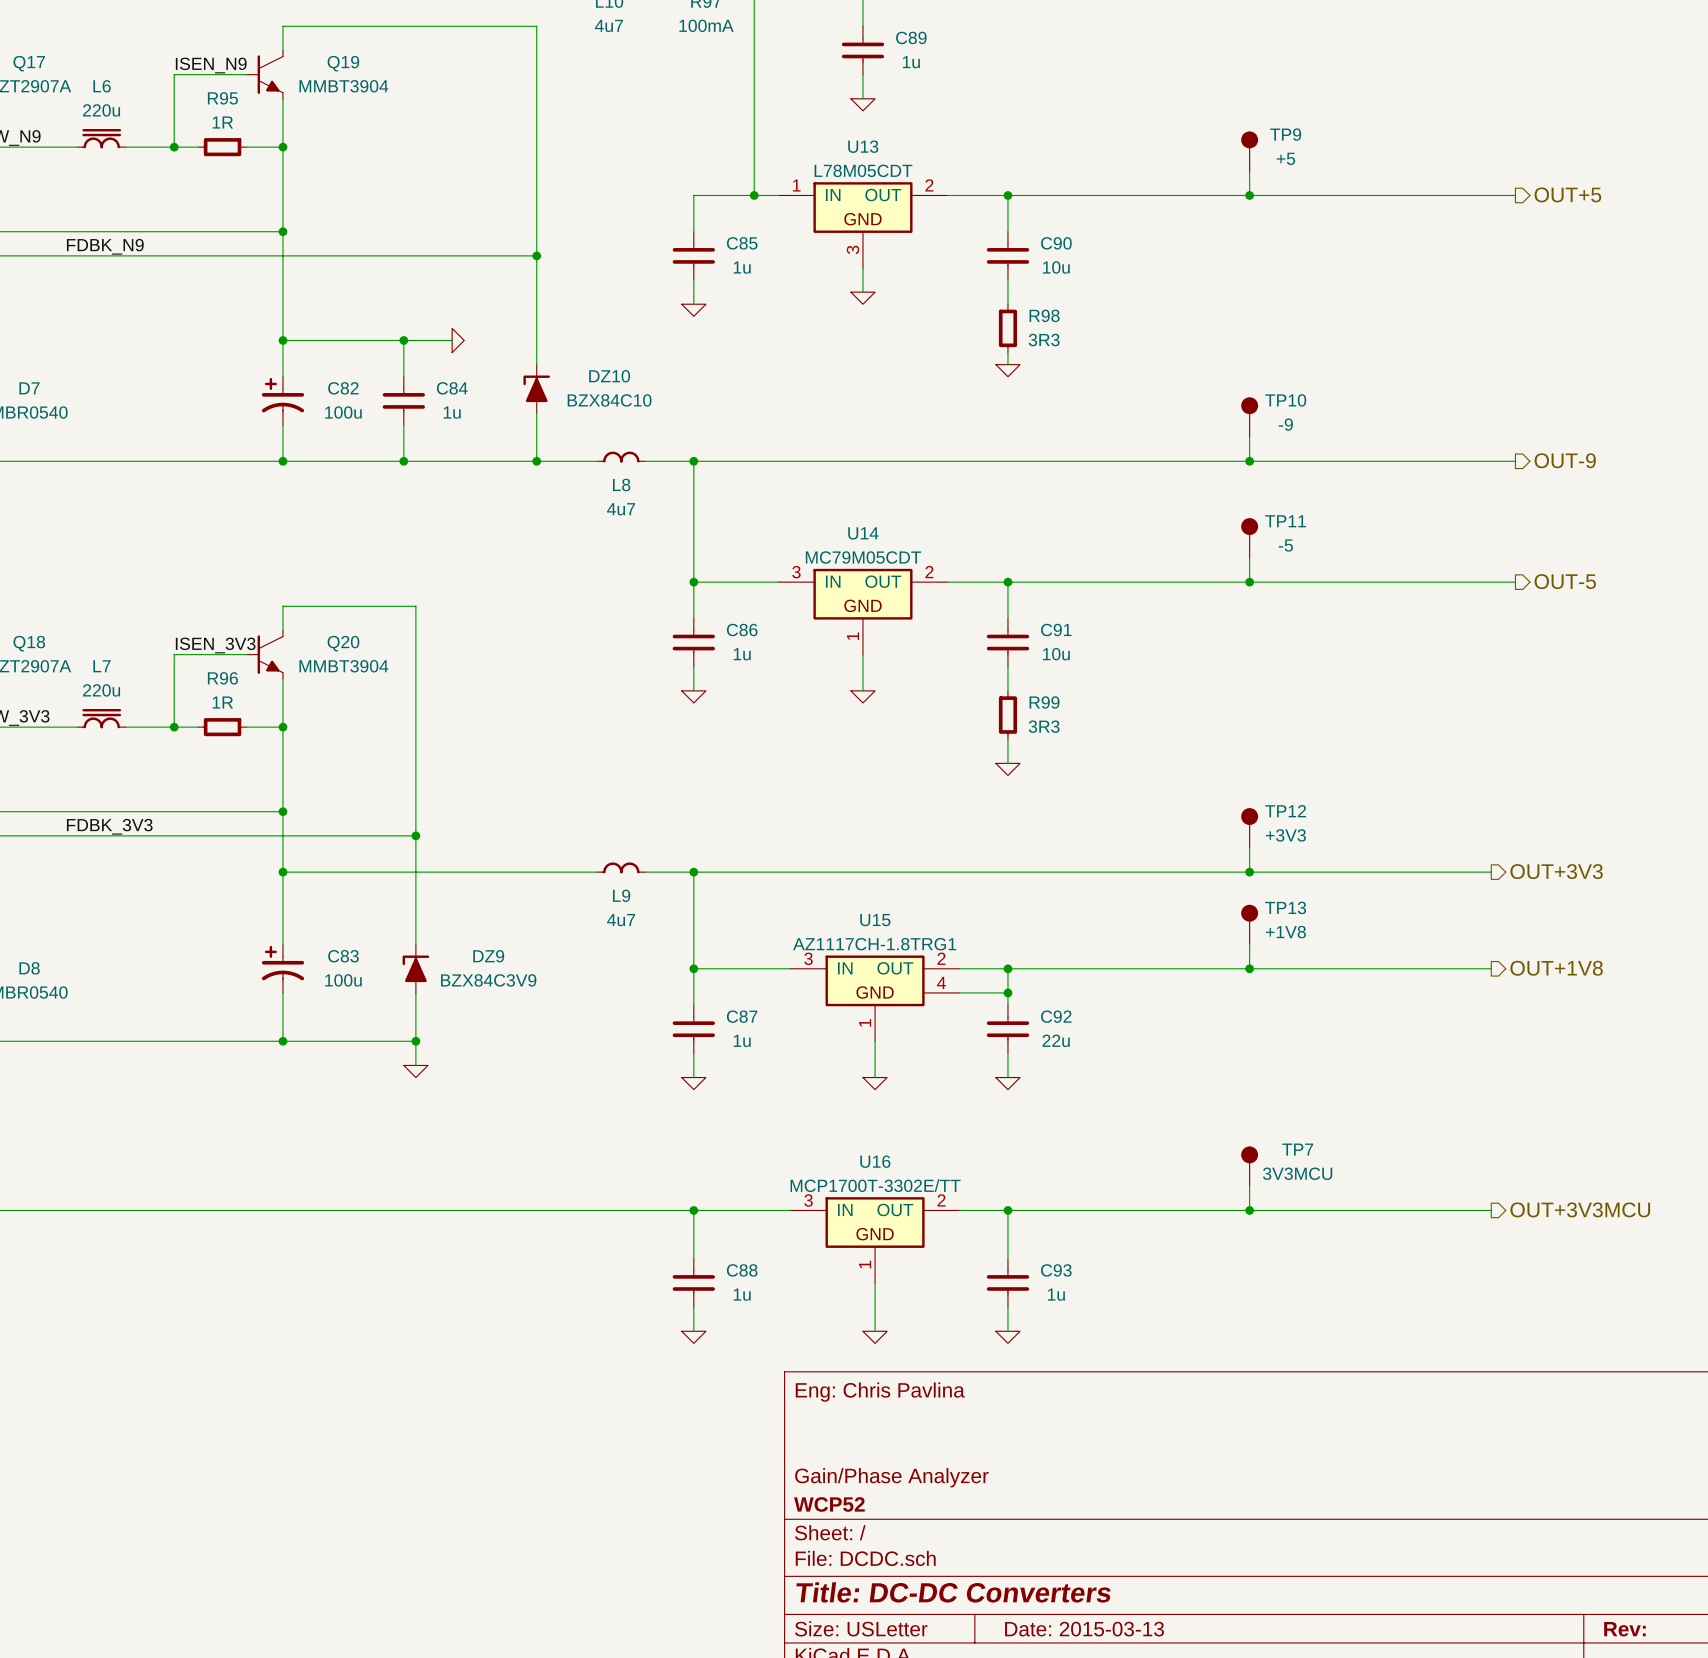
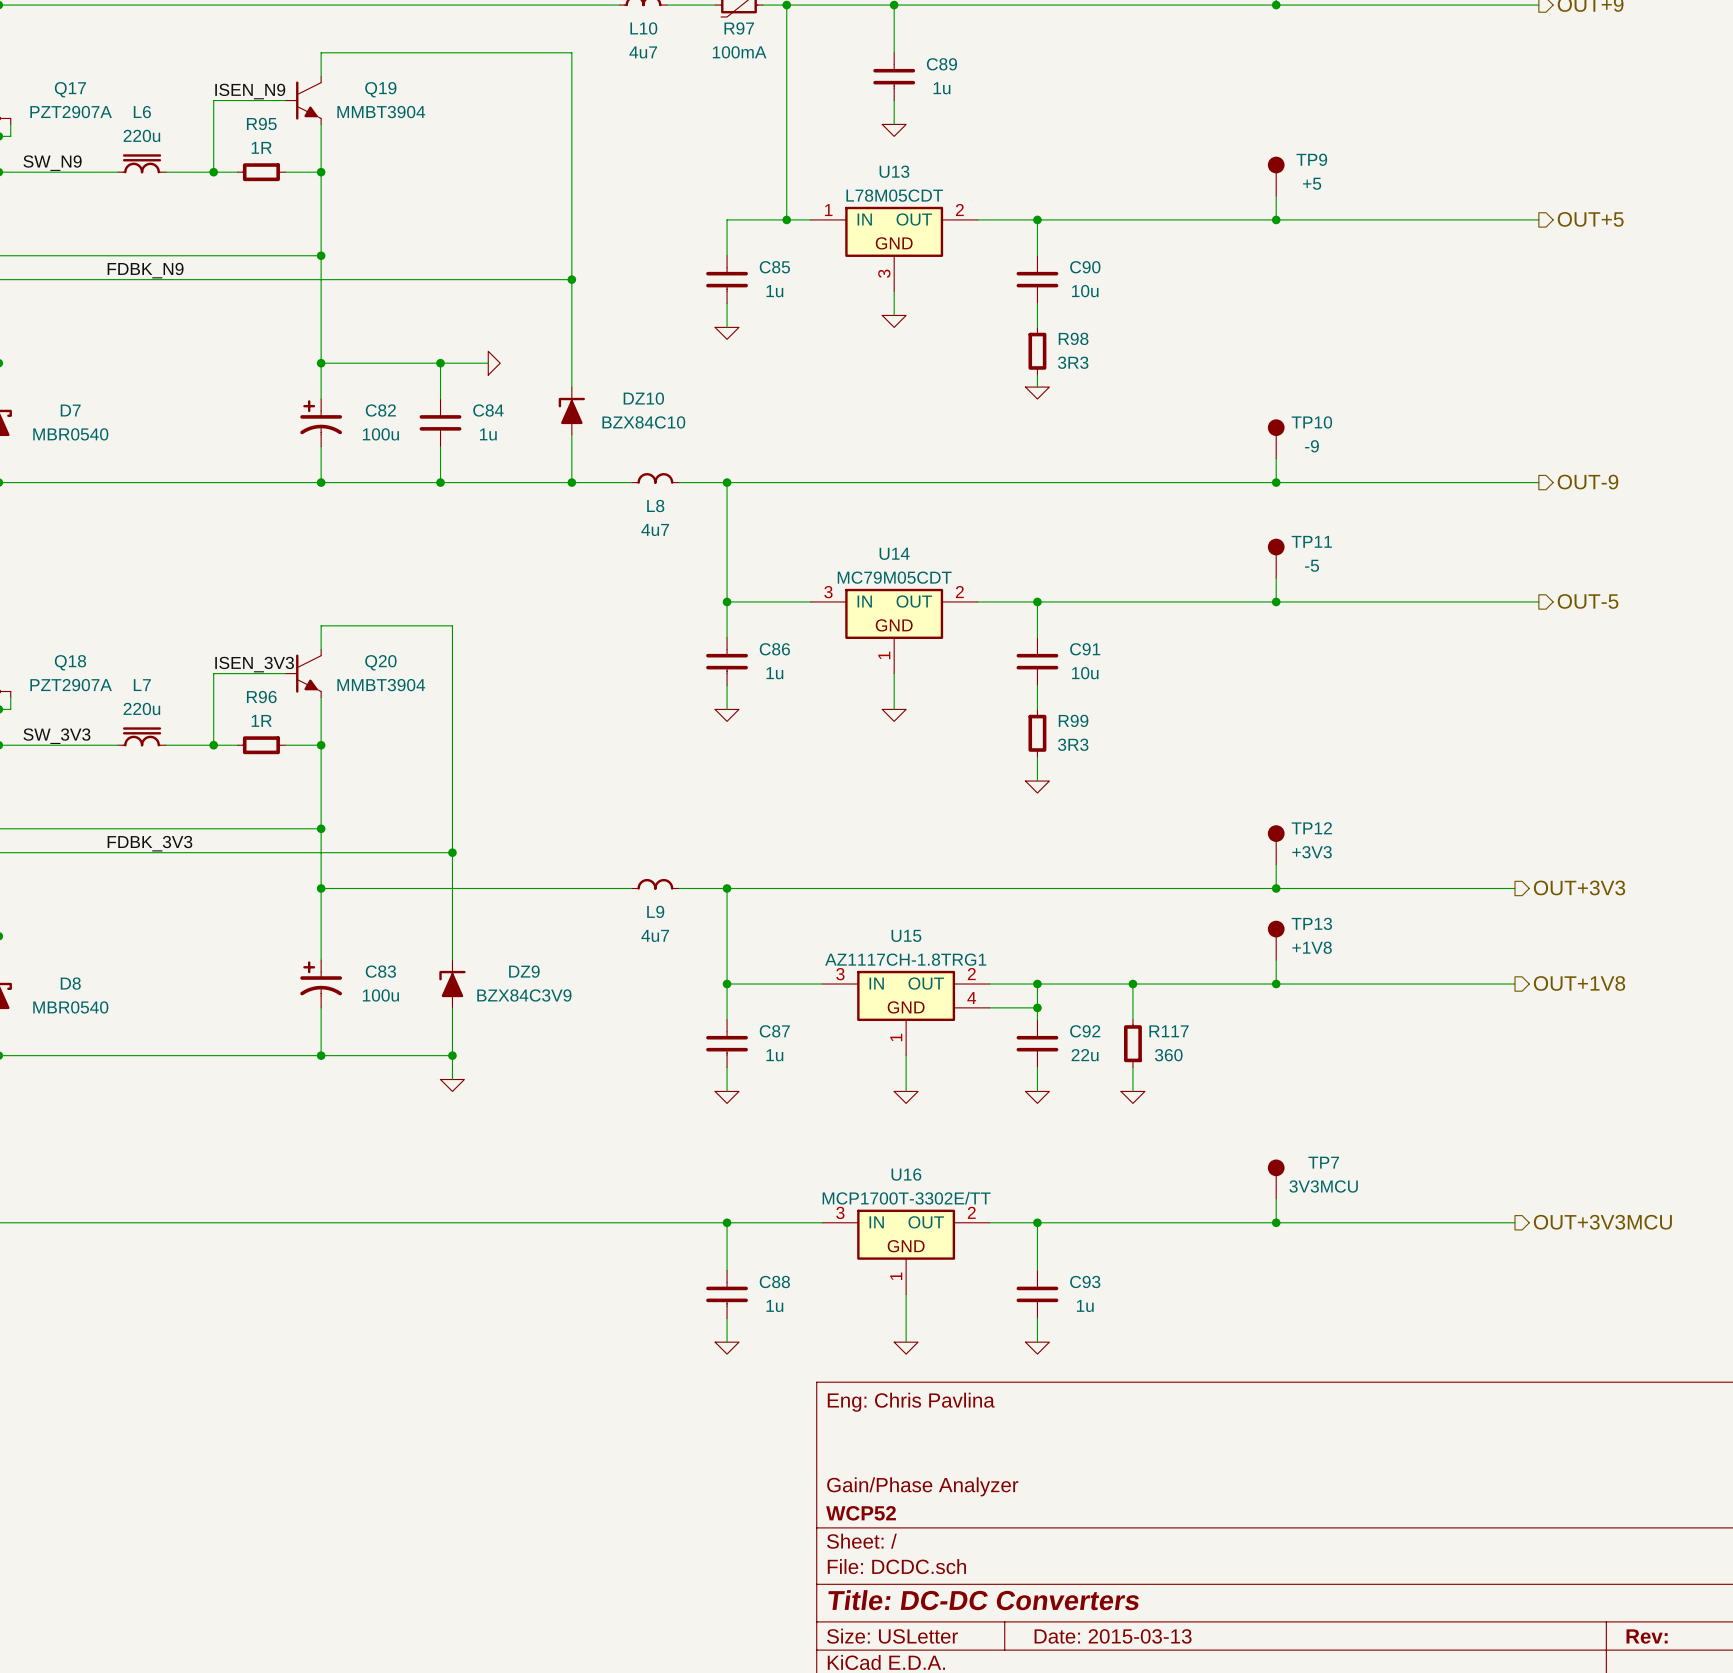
wire: none -> (1132, 984) (1132, 1019)
junction: none -> (1132, 984)
R117: none -> 360 (1132, 1043)
wire: none -> (1132, 1067) (1132, 1091)
power symbol: none -> (1132, 1097)

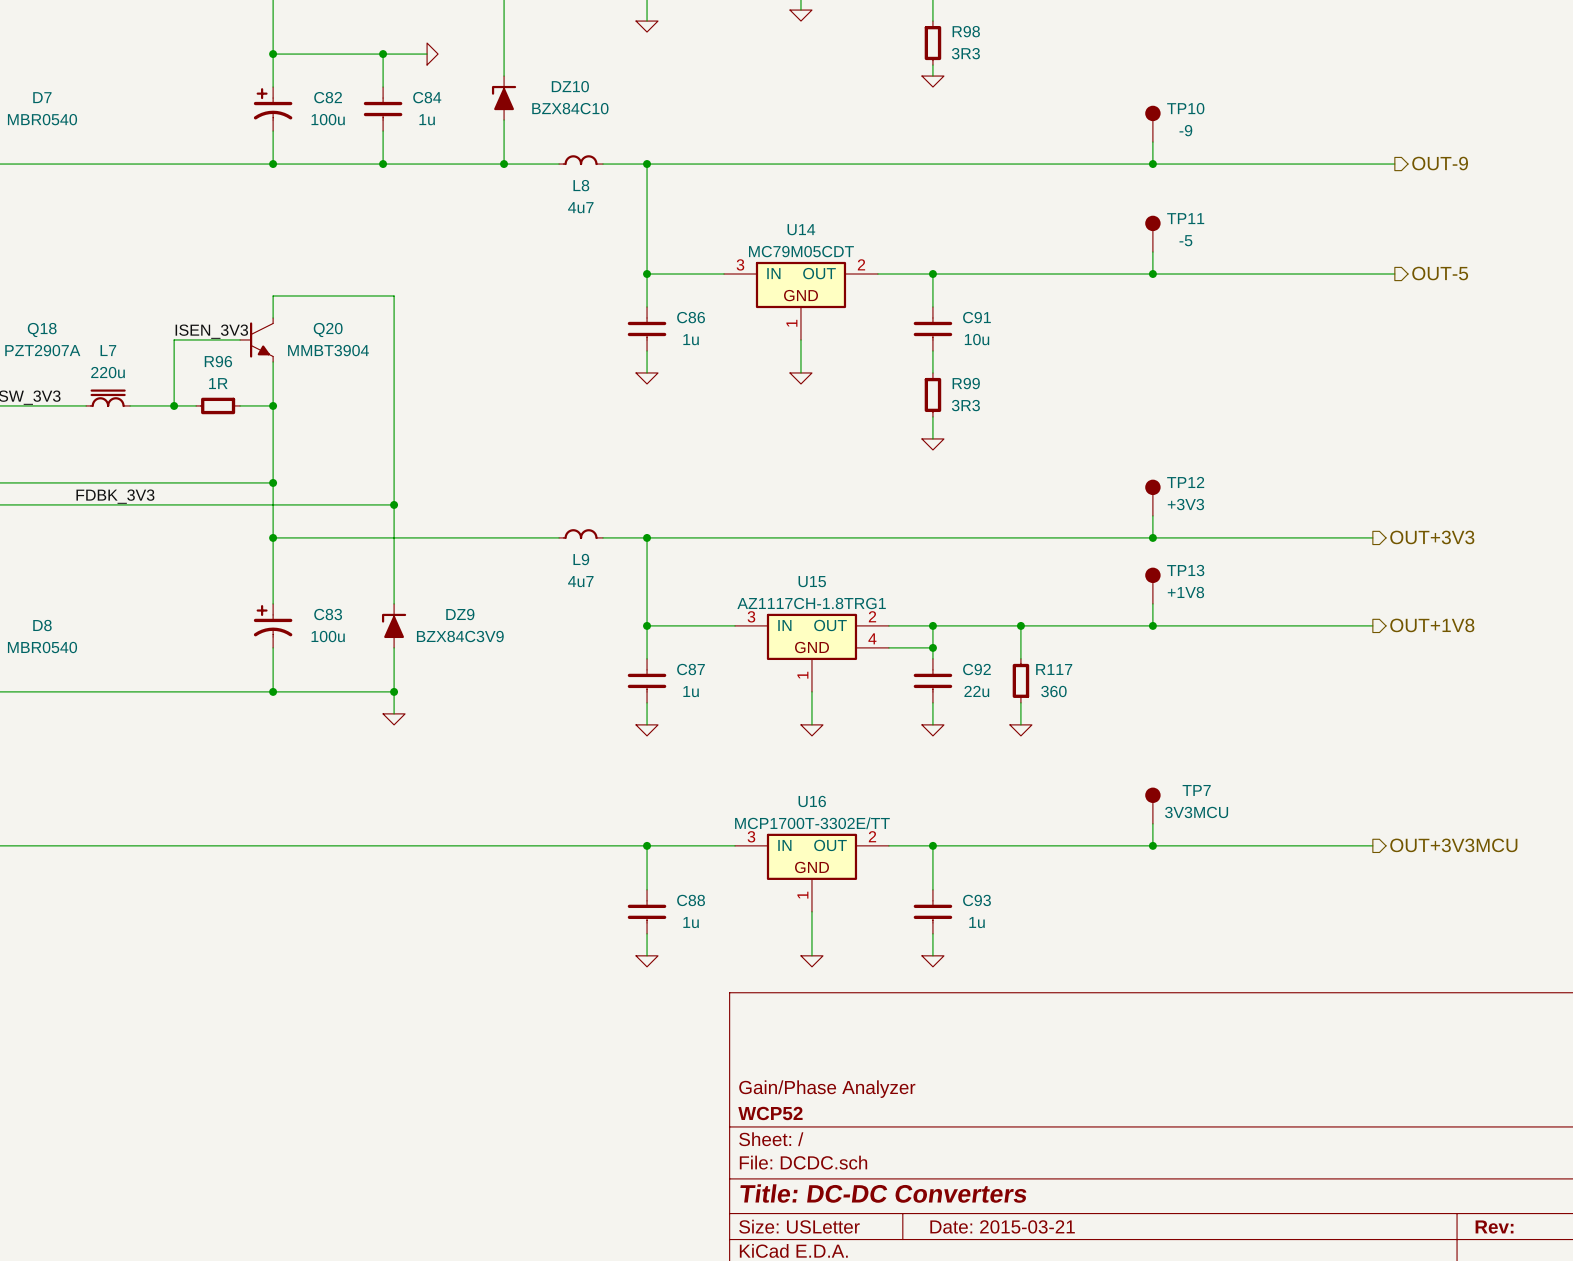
title block: Eng: Chris Pavlina (911, 1402) -> none
title block: Date: 2015-03-13 (1113, 1636) -> Date: 2015-03-21 (1002, 1226)

